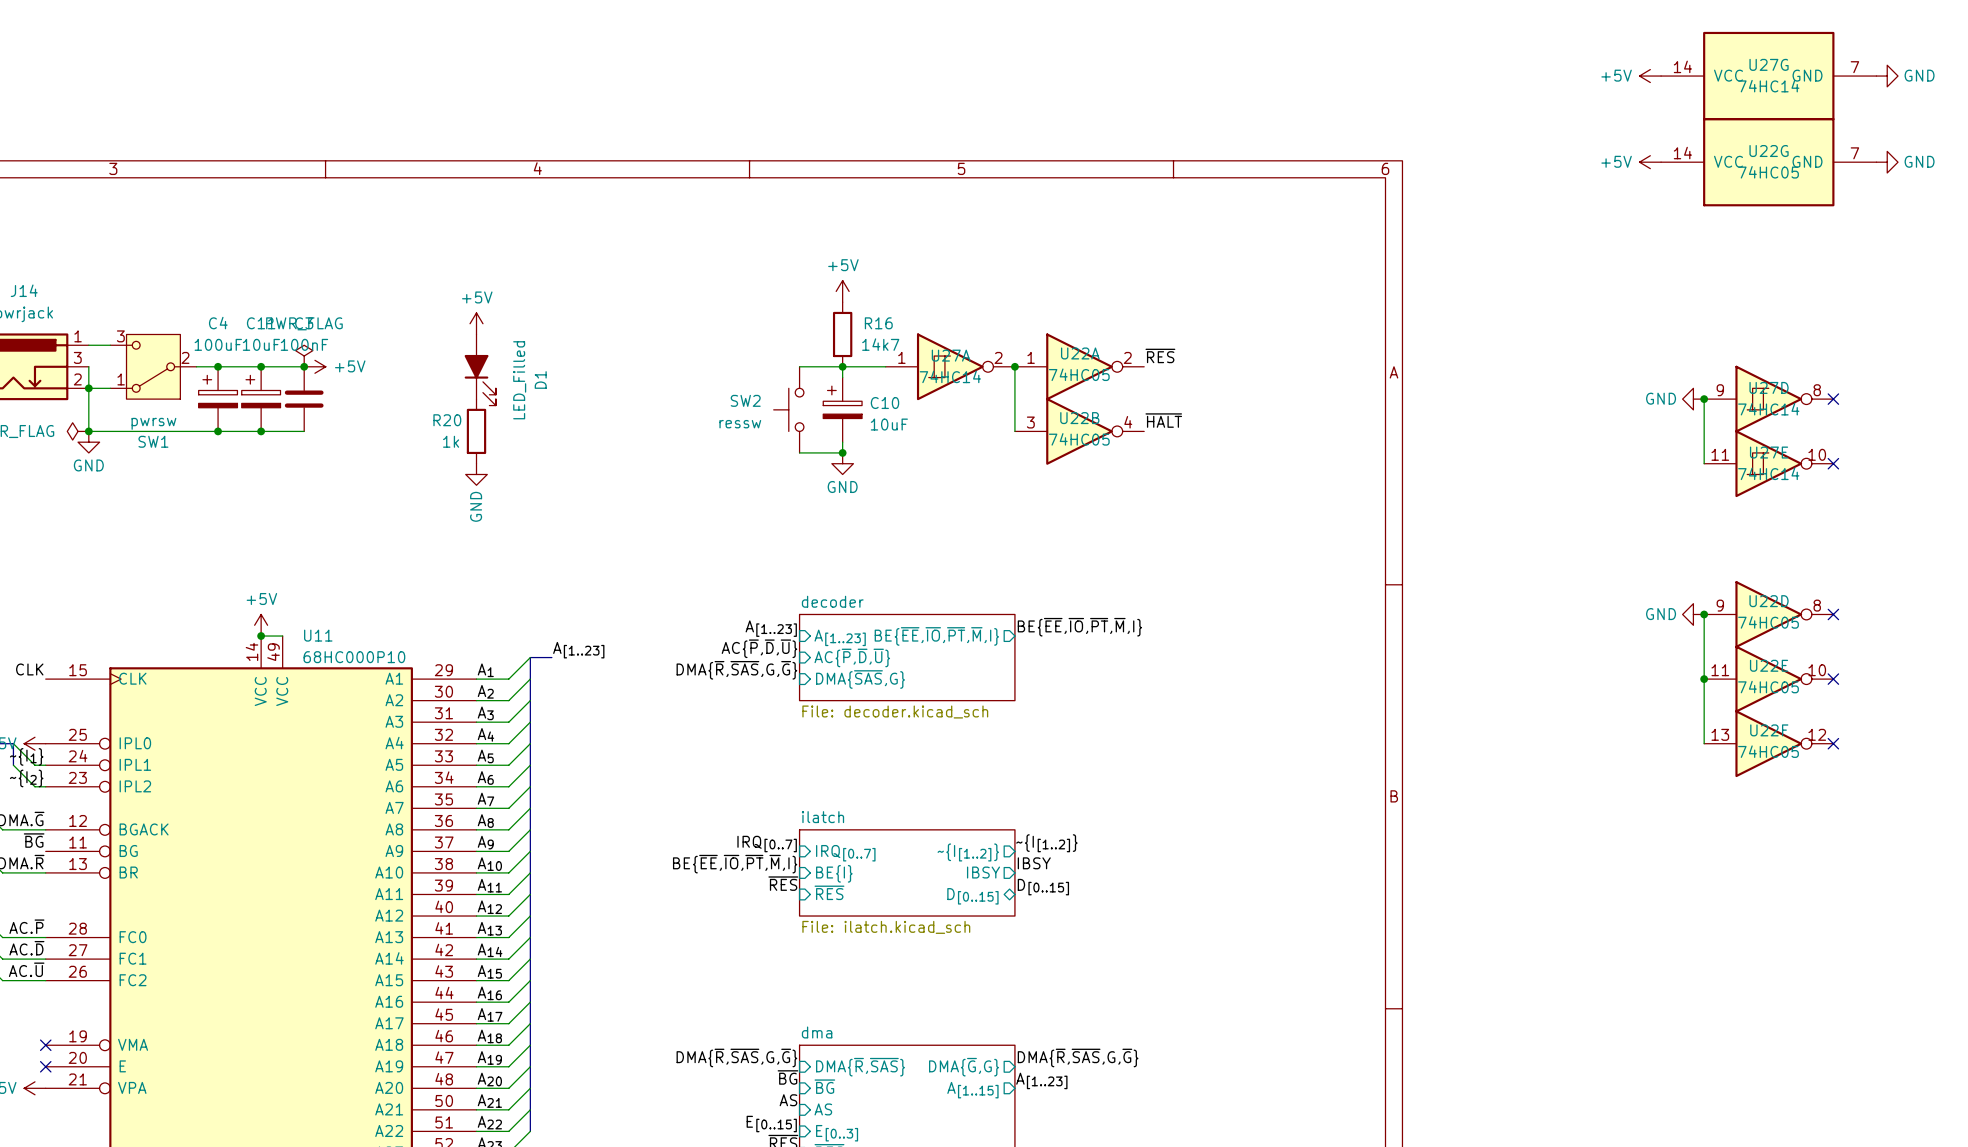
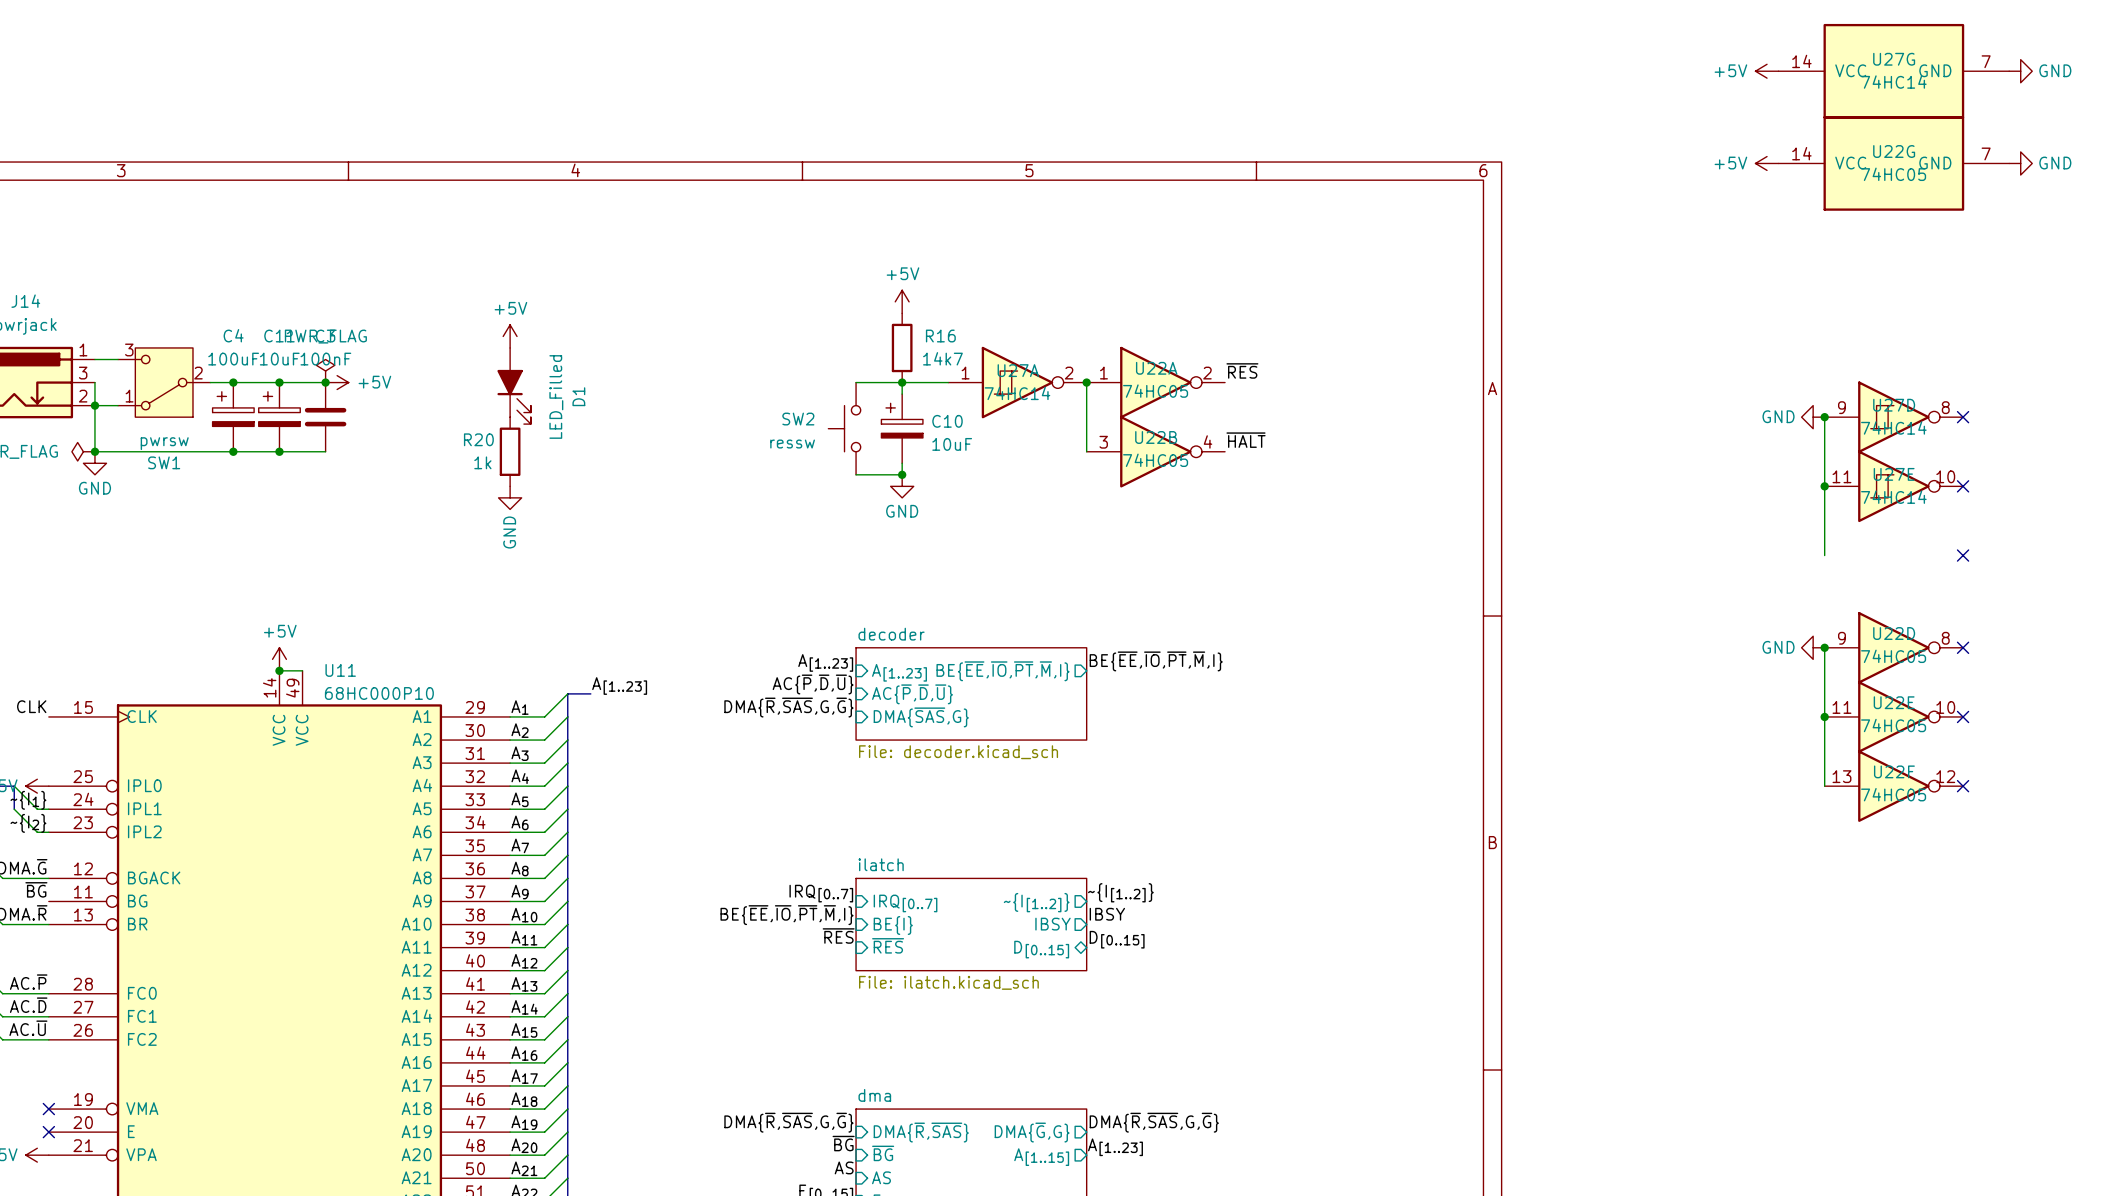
wire: none -> (1824, 486) (1824, 555)
junction: none -> (1824, 486)
no-connect mark: none -> (1963, 555)

